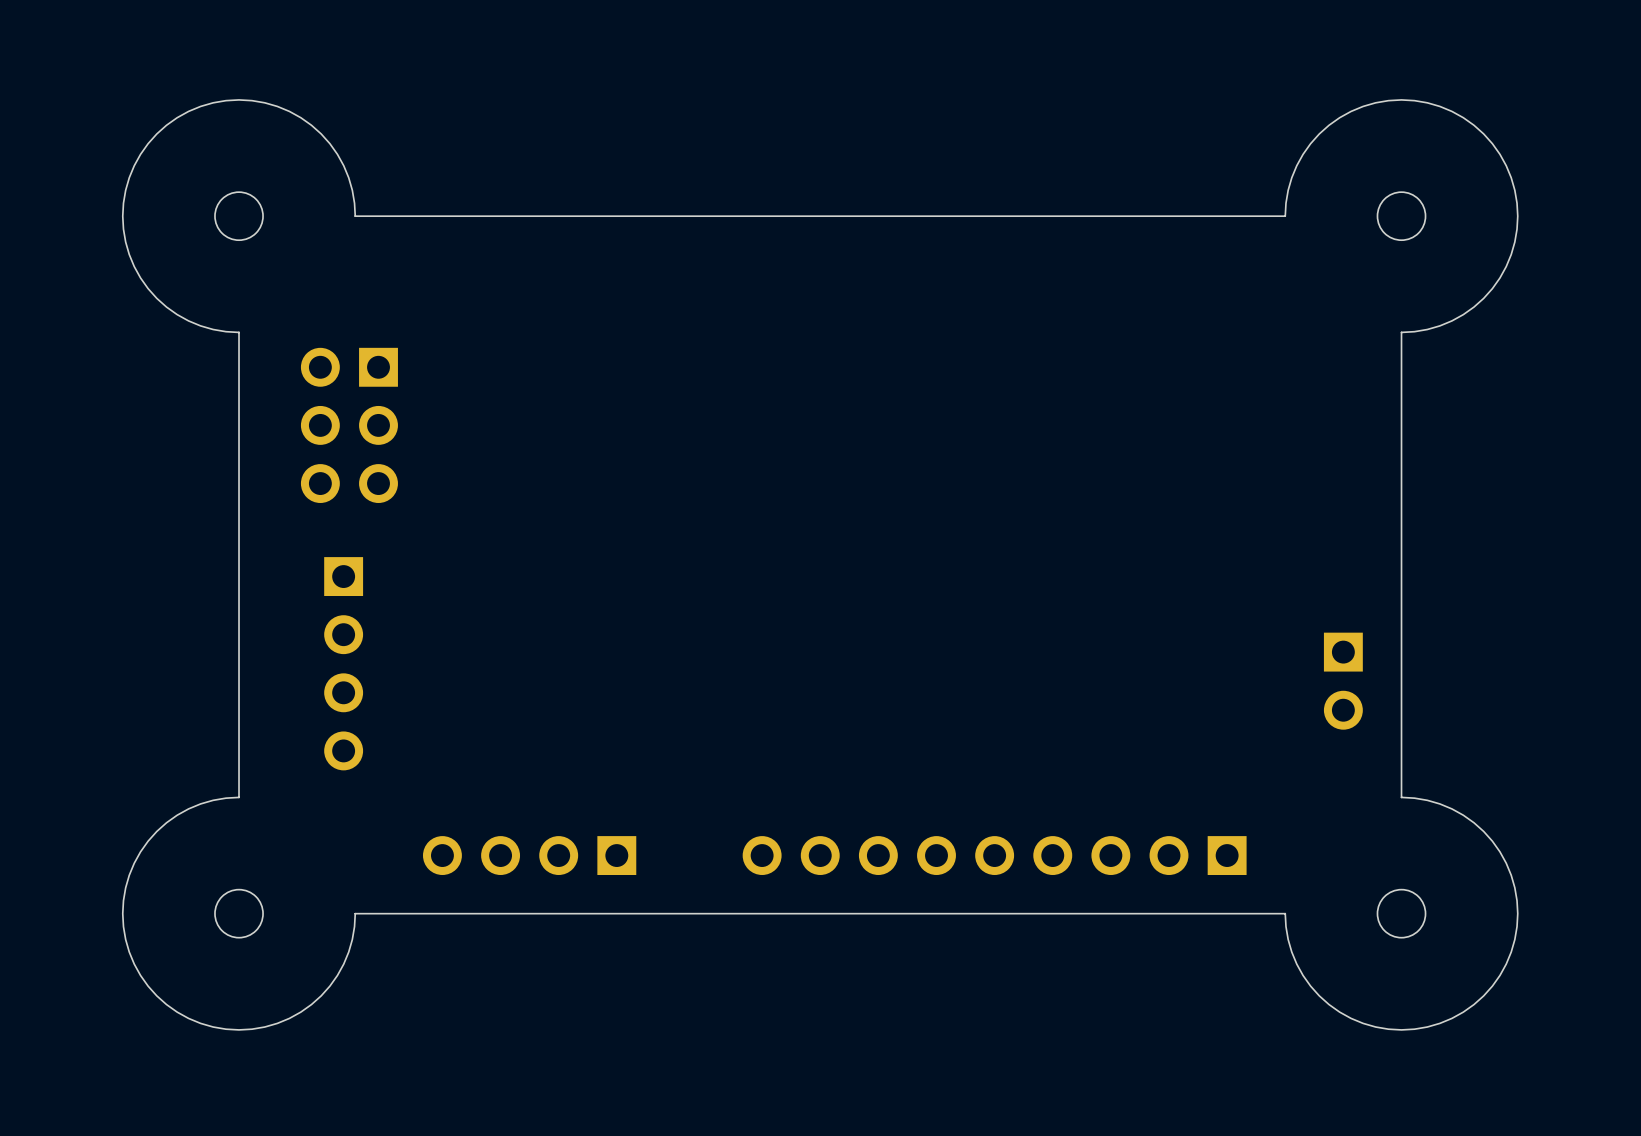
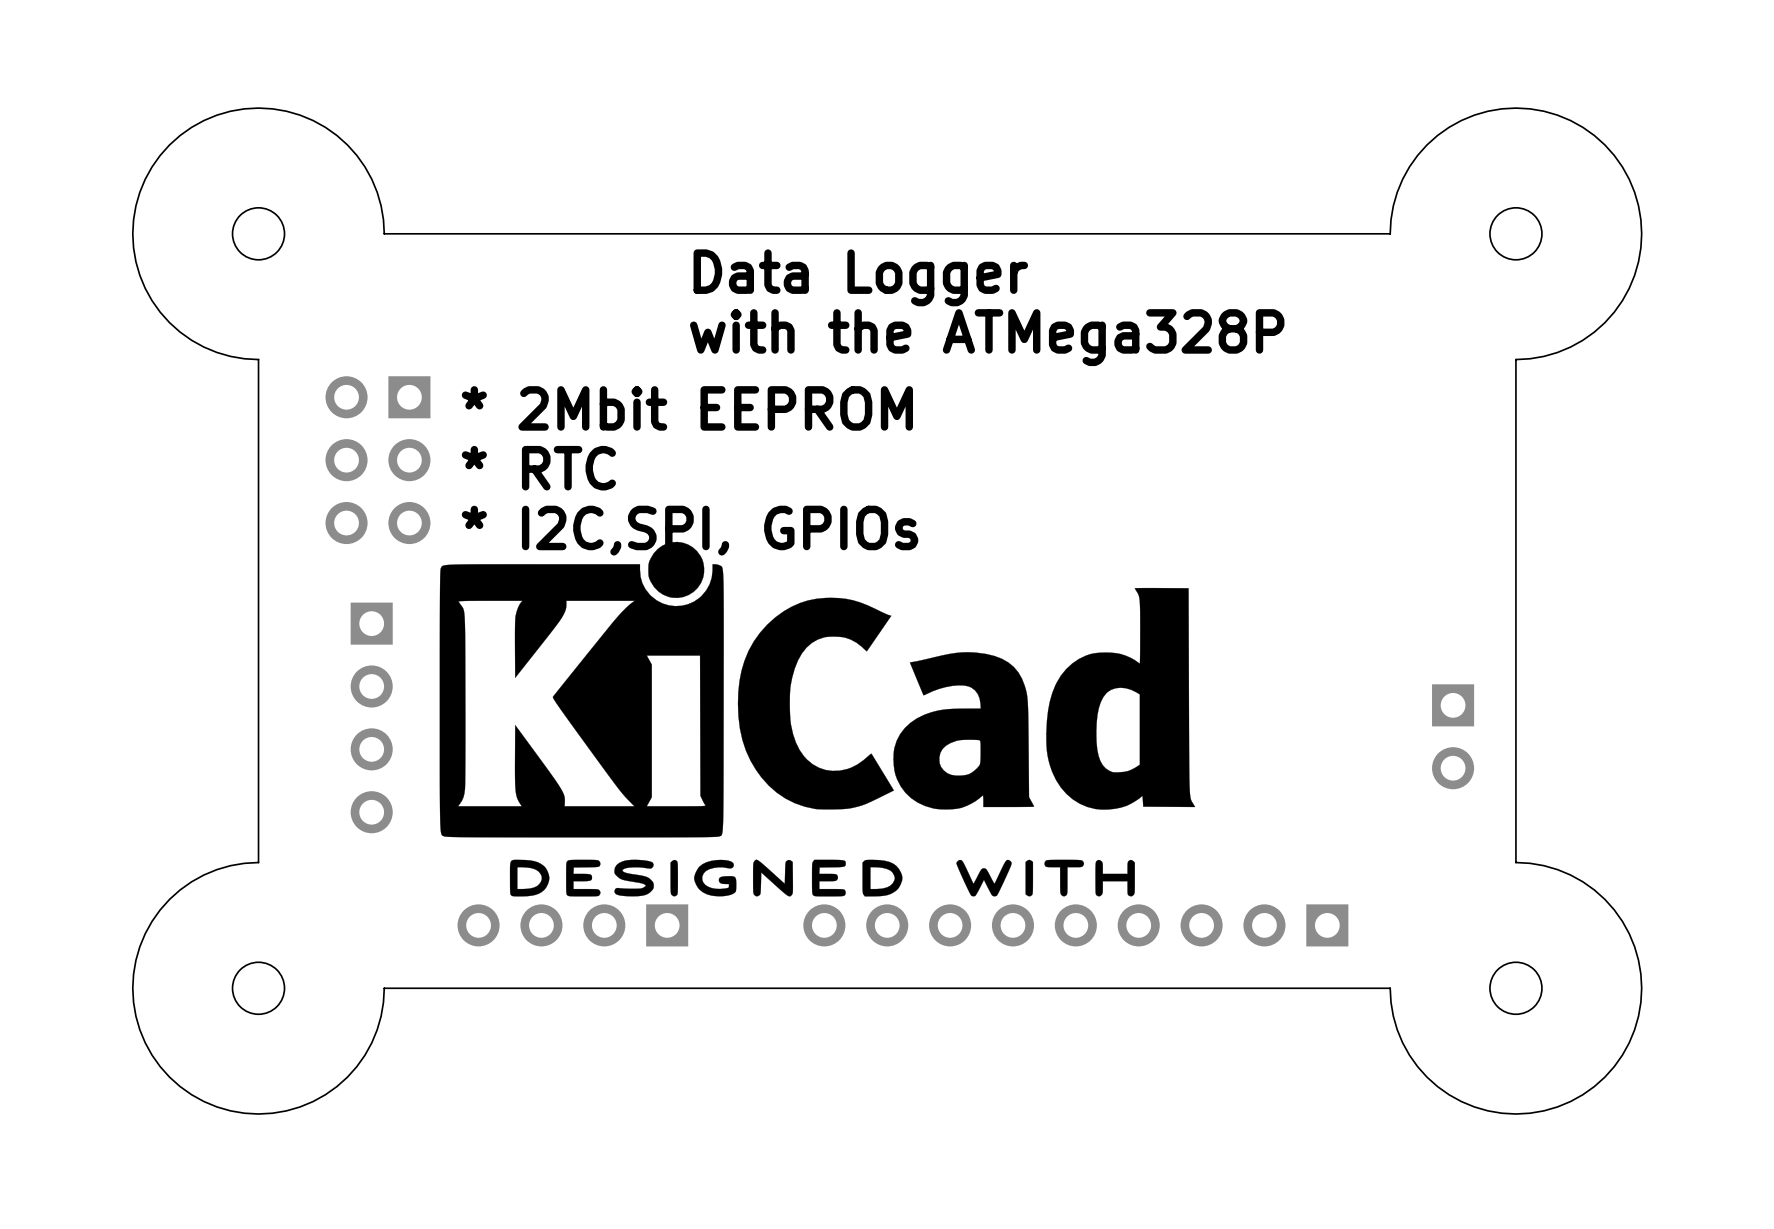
text: none -> Data Logger (860, 277)
text: none -> with the ATMega328P (987, 337)
text: none -> * 2Mbit EEPROM (687, 408)
text: none -> * RTC (538, 468)
text: none -> * I2C,SPI, GPIOs (690, 530)
drawing: none -> [439, 541, 1196, 897]

